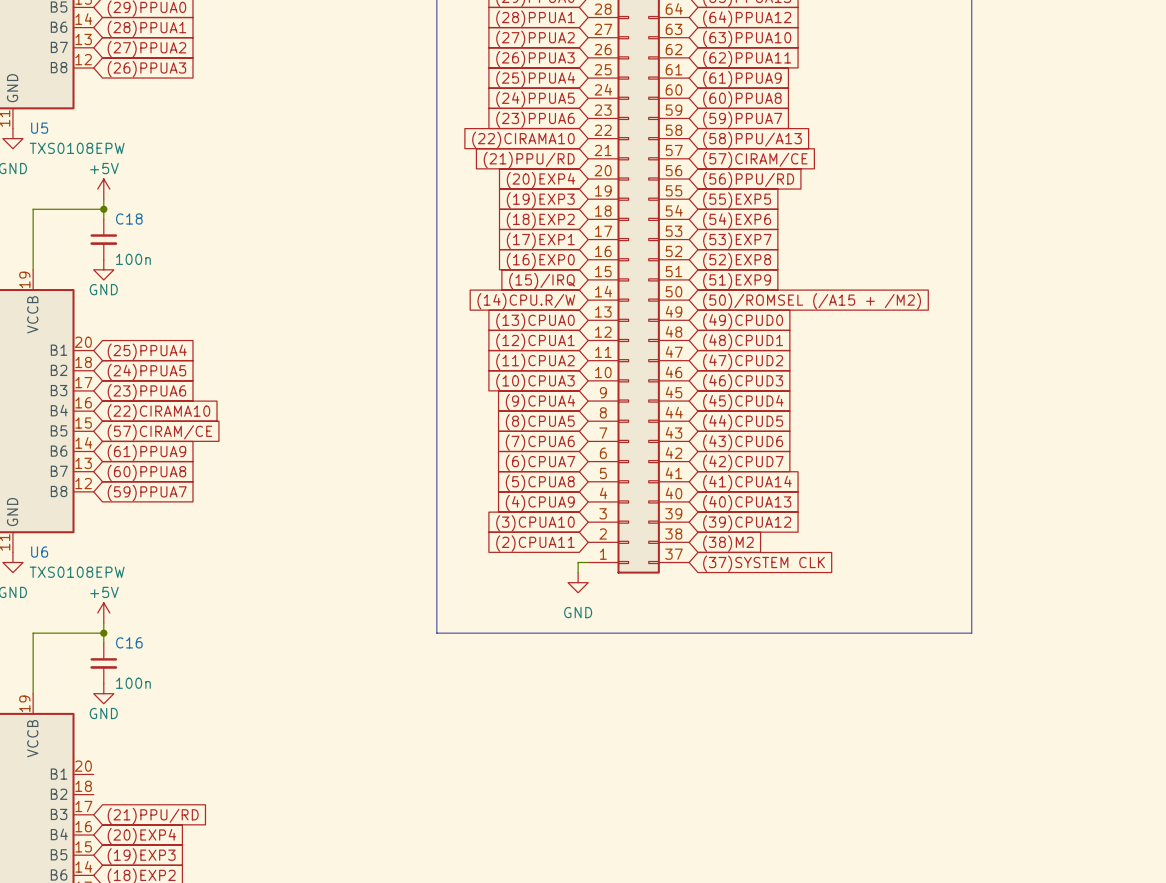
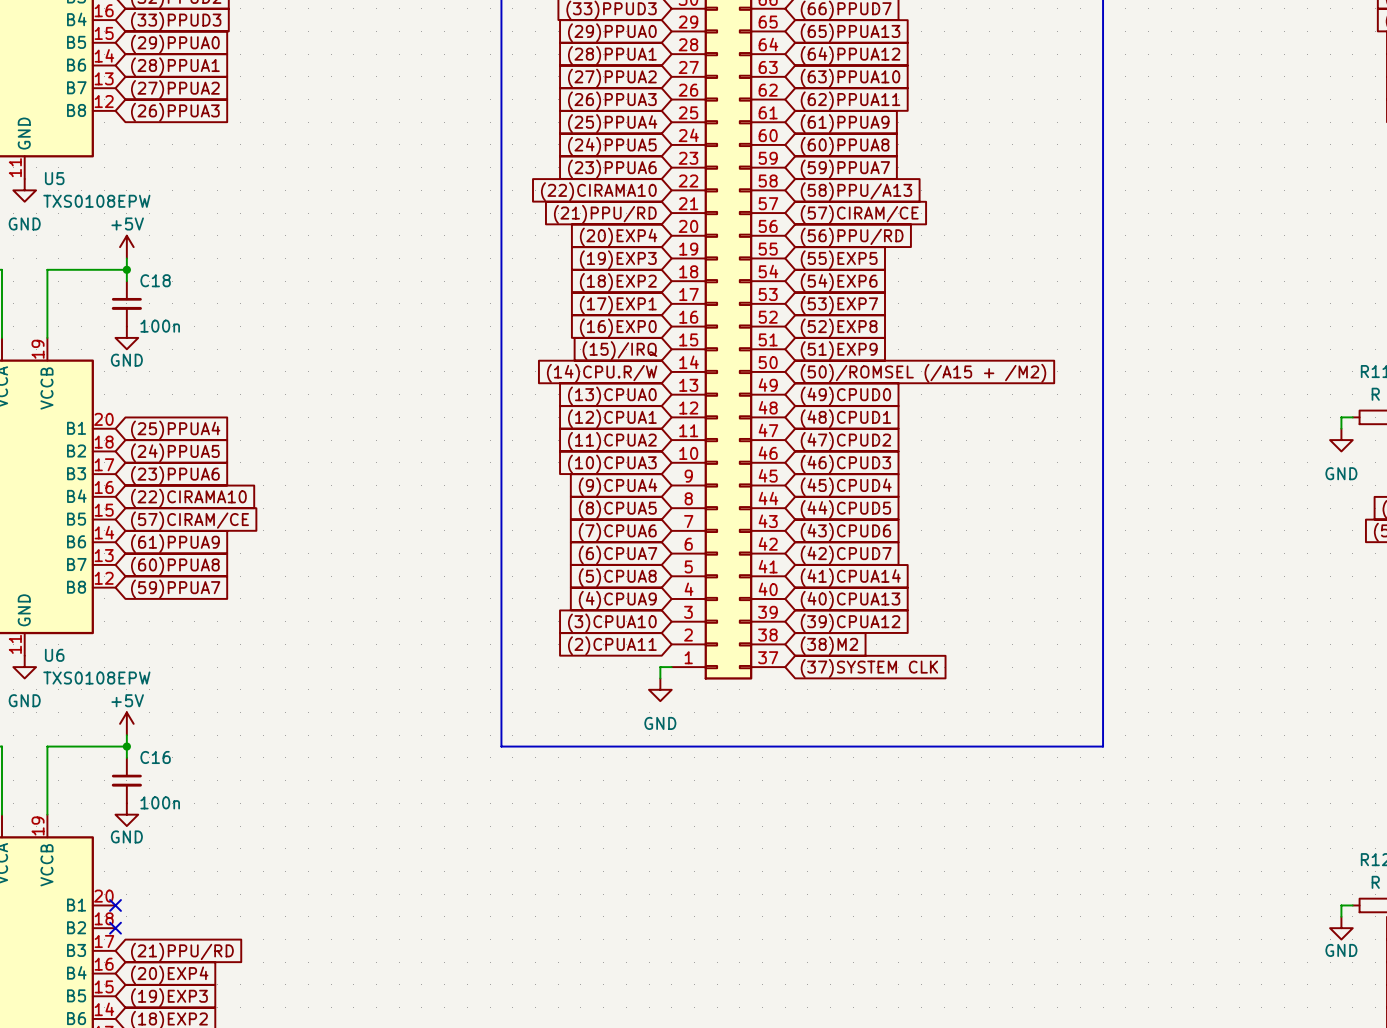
no-connect mark: none -> (115, 905)
no-connect mark: none -> (115, 928)

